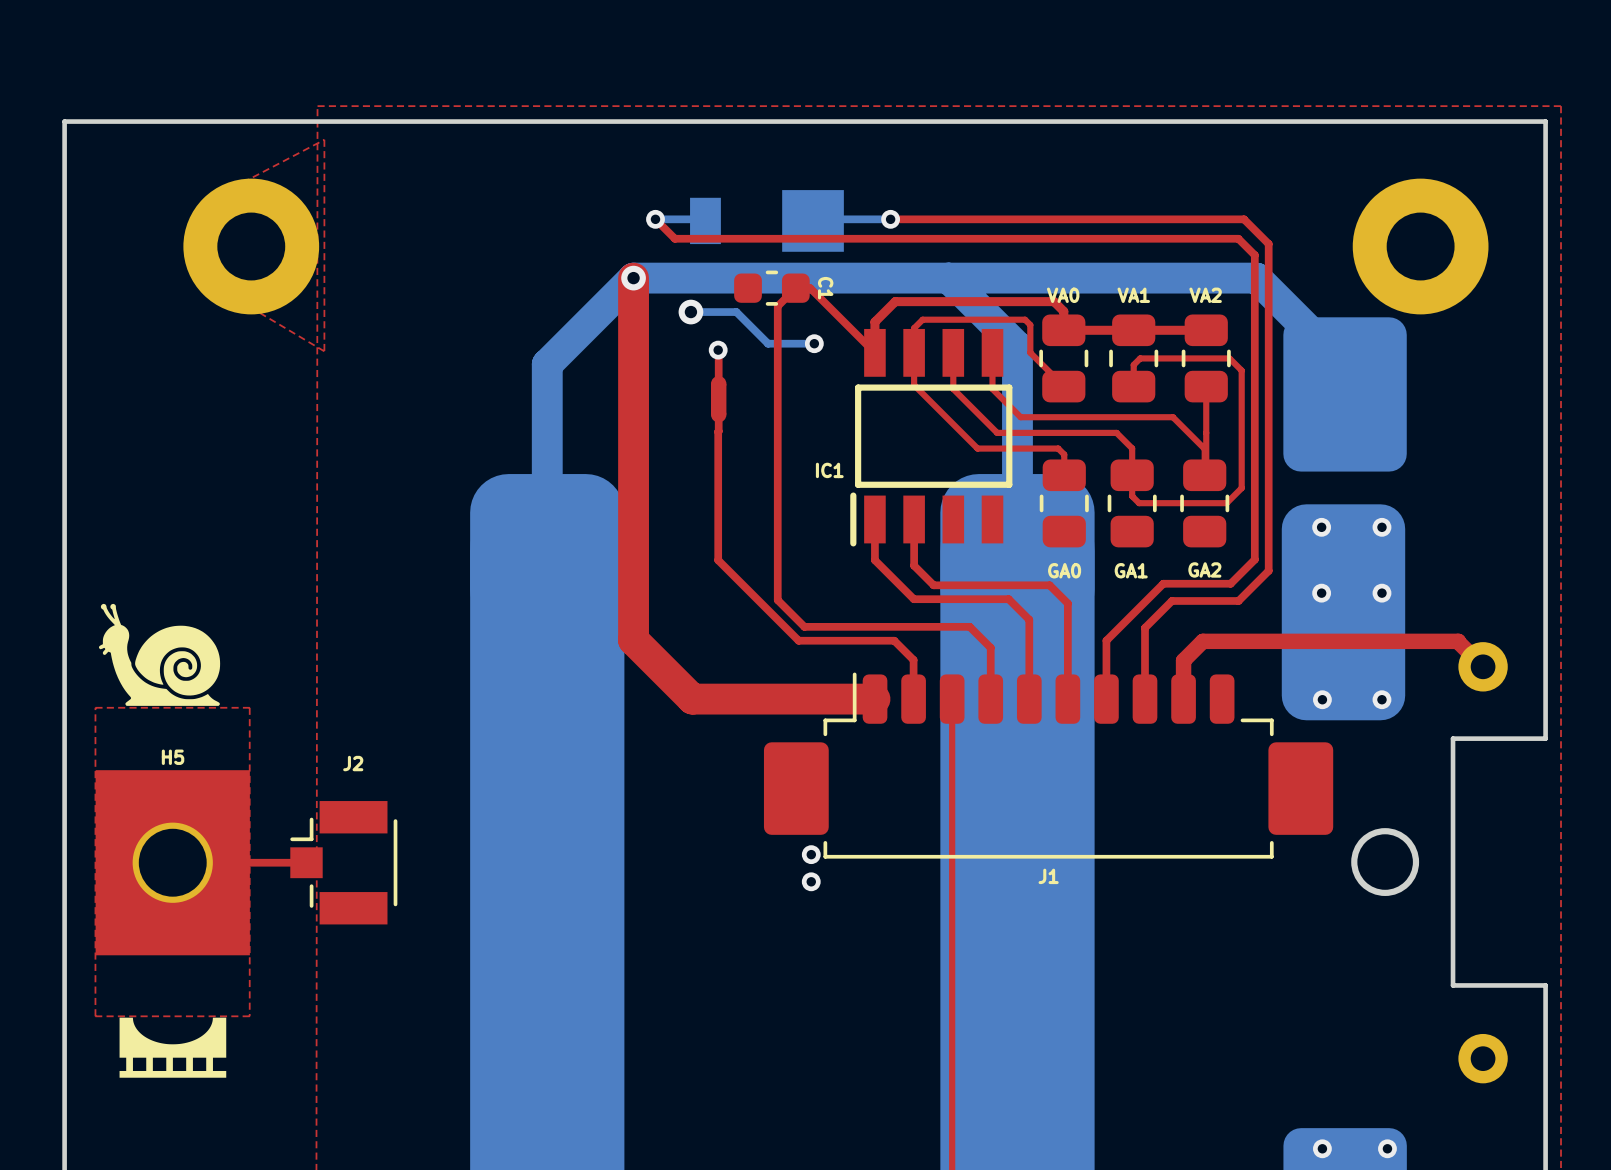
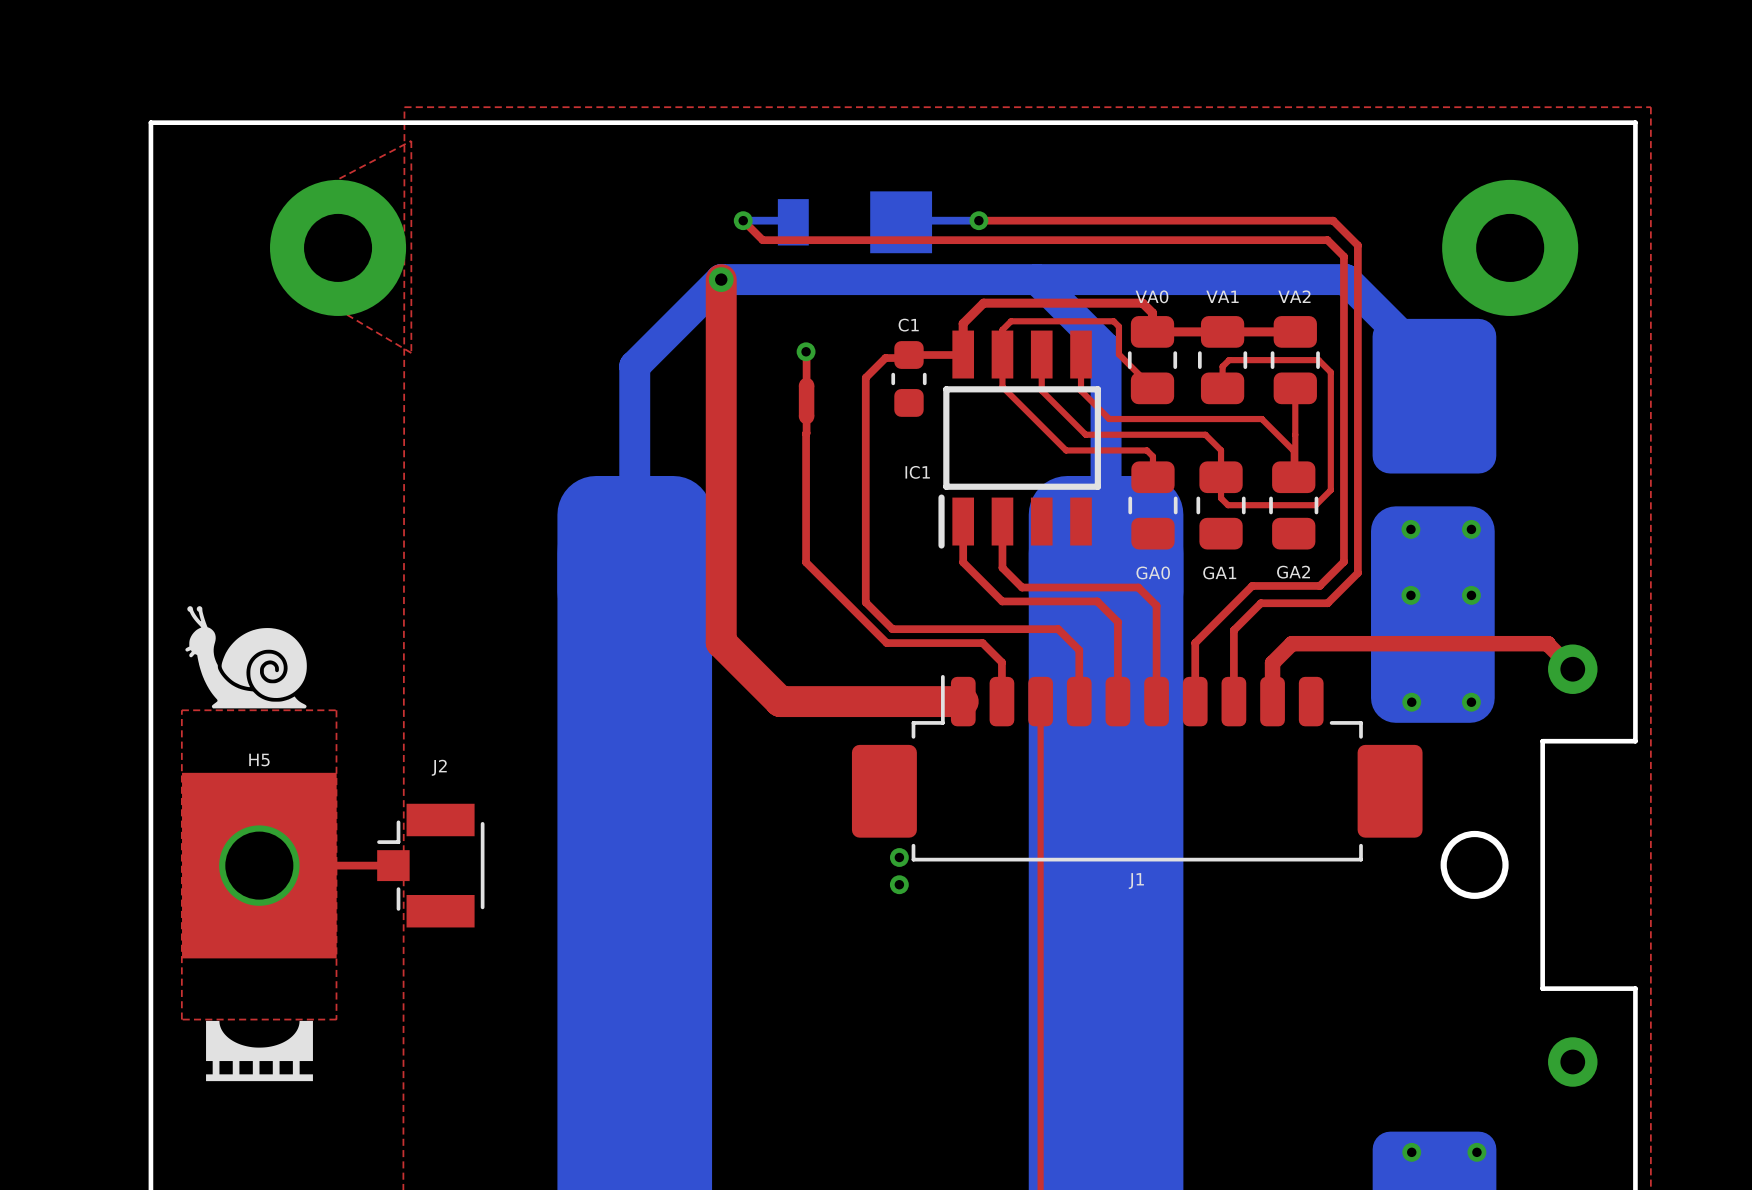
C1 rotation: 0° (771, 288) -> 90° clockwise (908, 378)
C1 position: (771, 288) -> (908, 378)
C1 name position: C1 (825, 288) -> C1 (908, 325)
bottom track: (690, 312) (736, 312) (768, 343) (814, 343) -> none
via: (690, 312) -> none
via: (814, 343) -> none
top track: (874, 352) (810, 288) (795, 288) (777, 306) (777, 376) -> (962, 355) (908, 355)
top track: none -> (907, 358) (885, 358) (865, 377)

